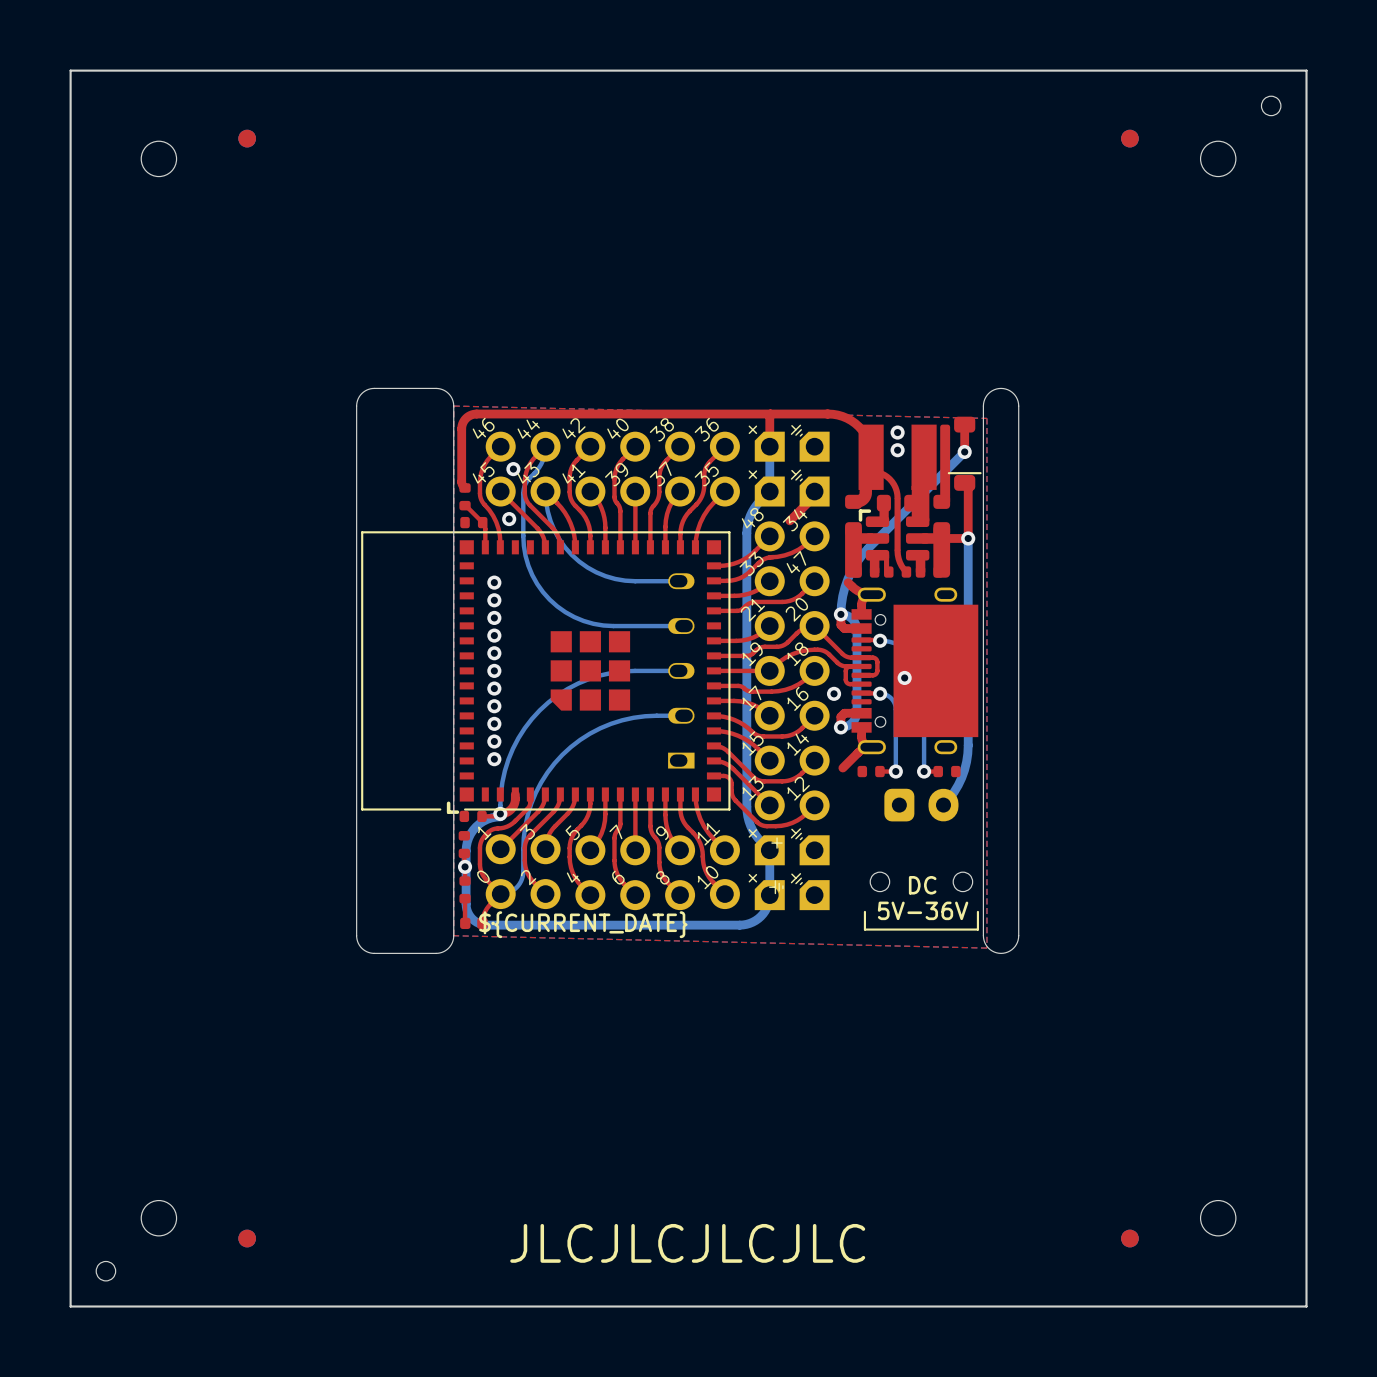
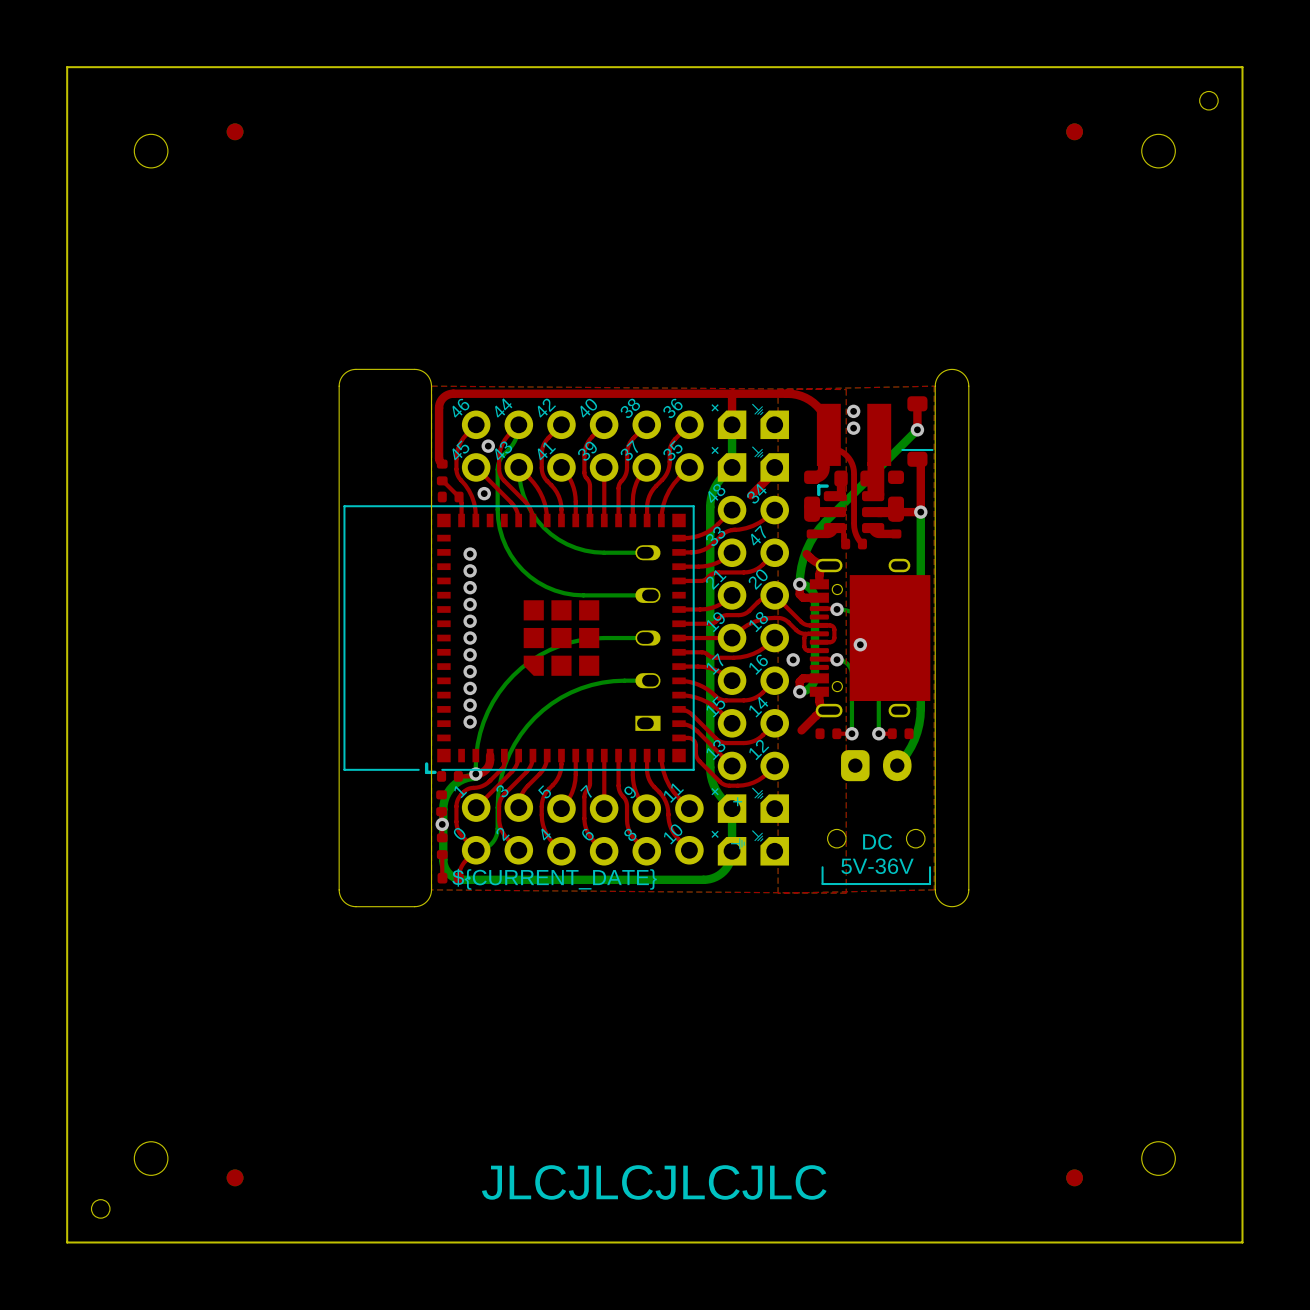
top zone outline: (453, 406) (986, 418) (986, 948) (453, 935) -> (431, 386) (846, 389) (846, 893) (431, 889)
top zone outline: none -> (934, 386) (934, 889) (778, 893) (778, 389) (934, 386)
part footprint: [845, 424, 951, 578] -> [804, 403, 904, 550]

